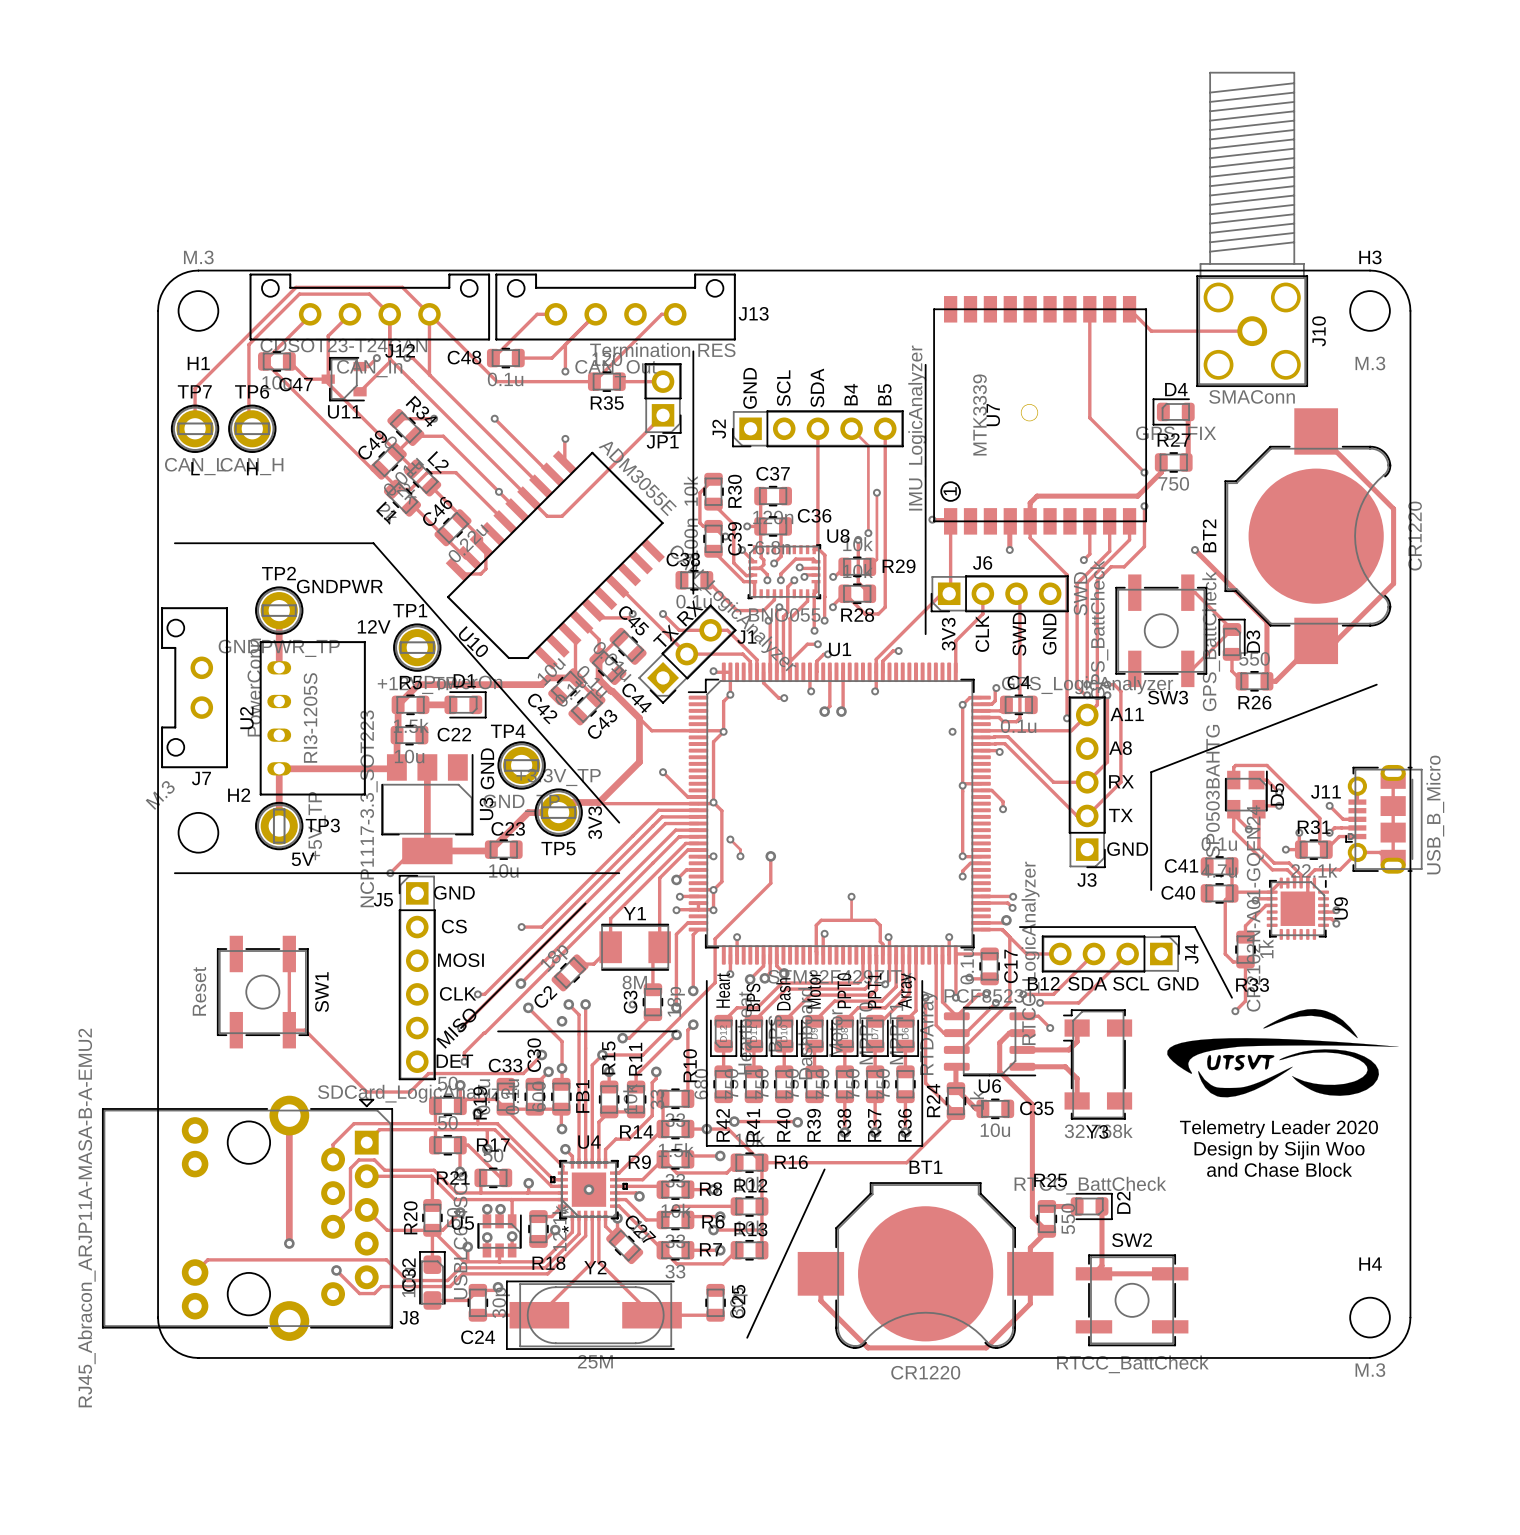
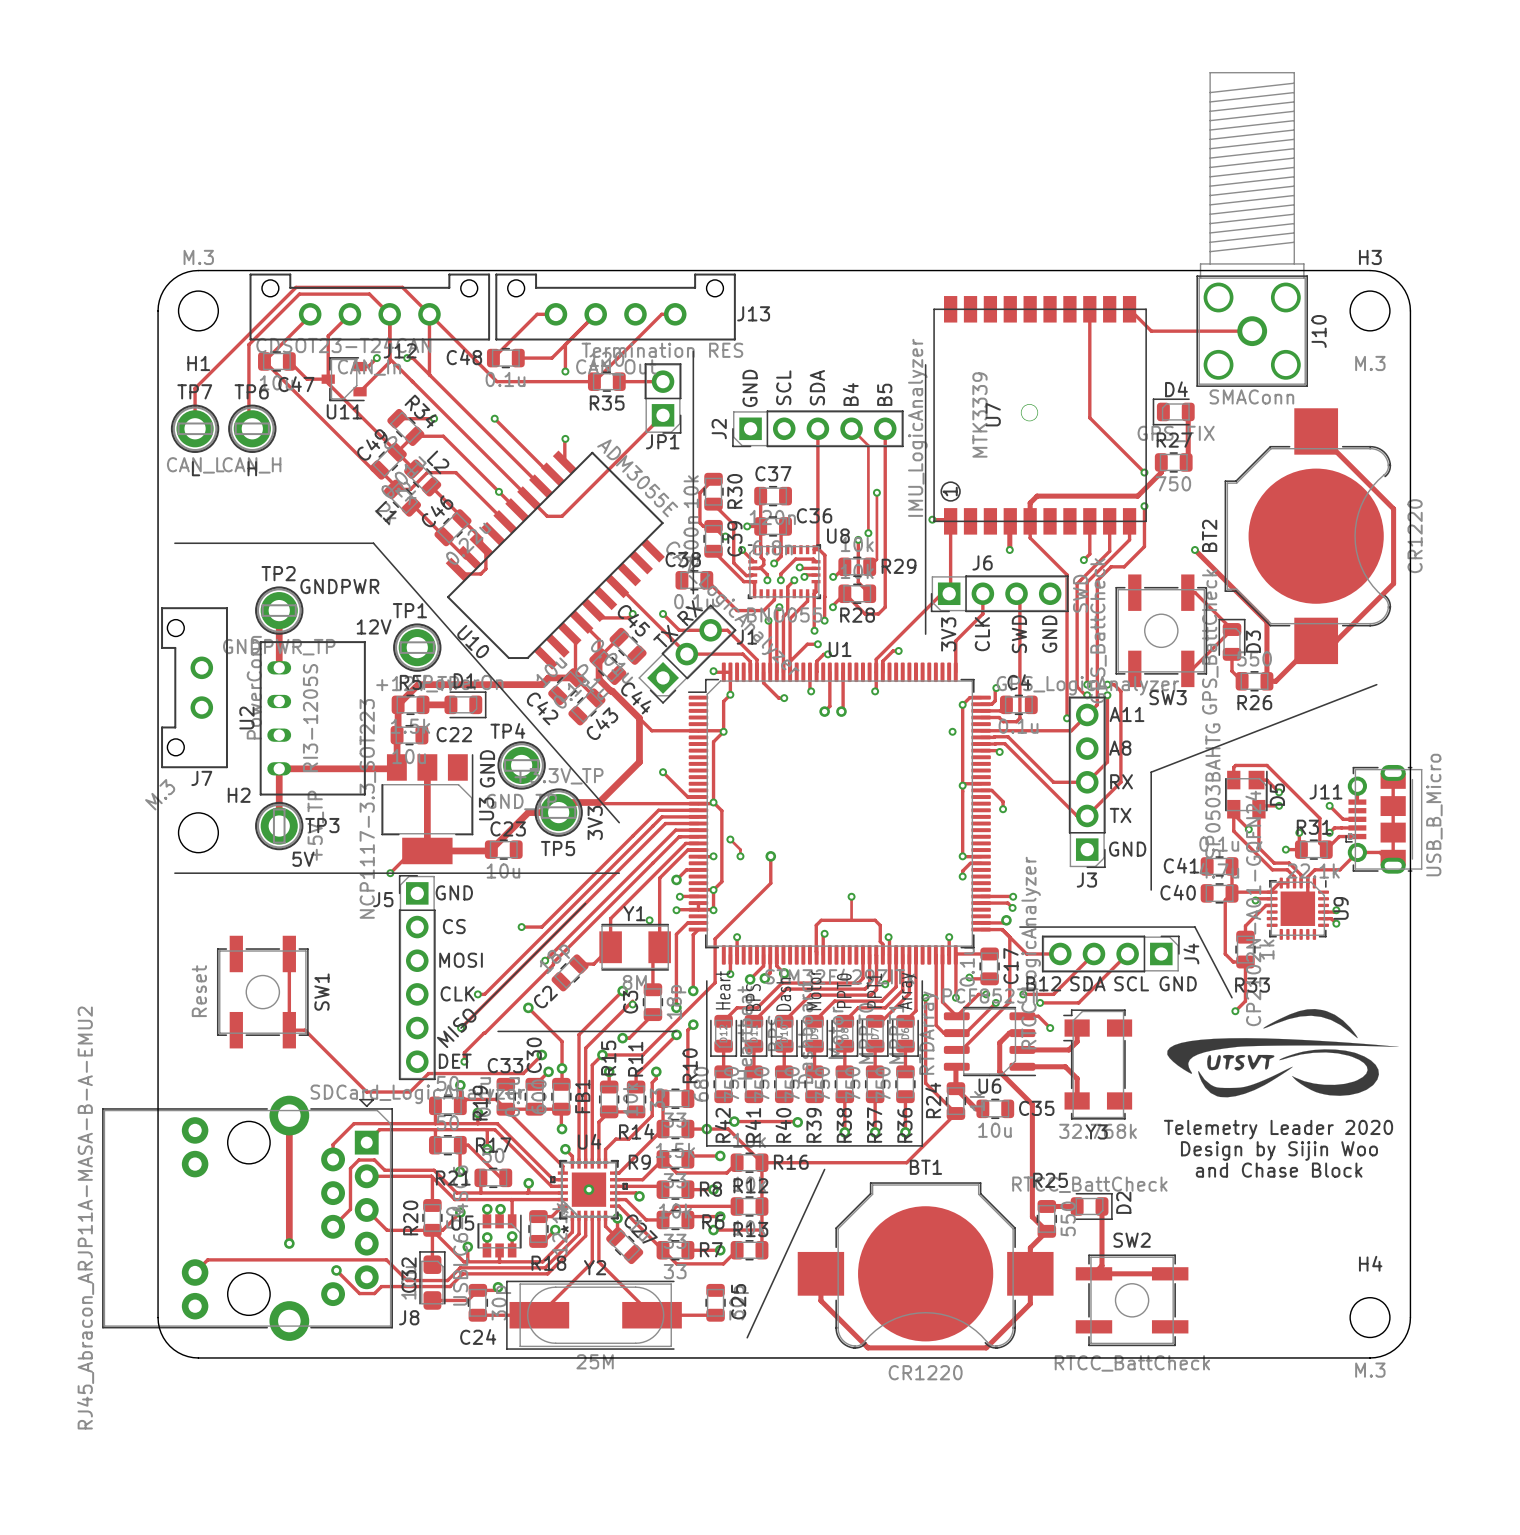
via: none -> (649, 920)
track: (545, 960) (520, 983) -> none
via: none -> (545, 960)
via: (520, 983) -> none
via: none -> (622, 991)
track: (568, 1004) (579, 1014) (579, 1034) -> (622, 991) (579, 1034)
via: (568, 1004) -> none
track: (585, 1004) (585, 1048) -> (632, 1001) (585, 1048)
via: (585, 1004) -> none
via: (562, 1021) -> none

